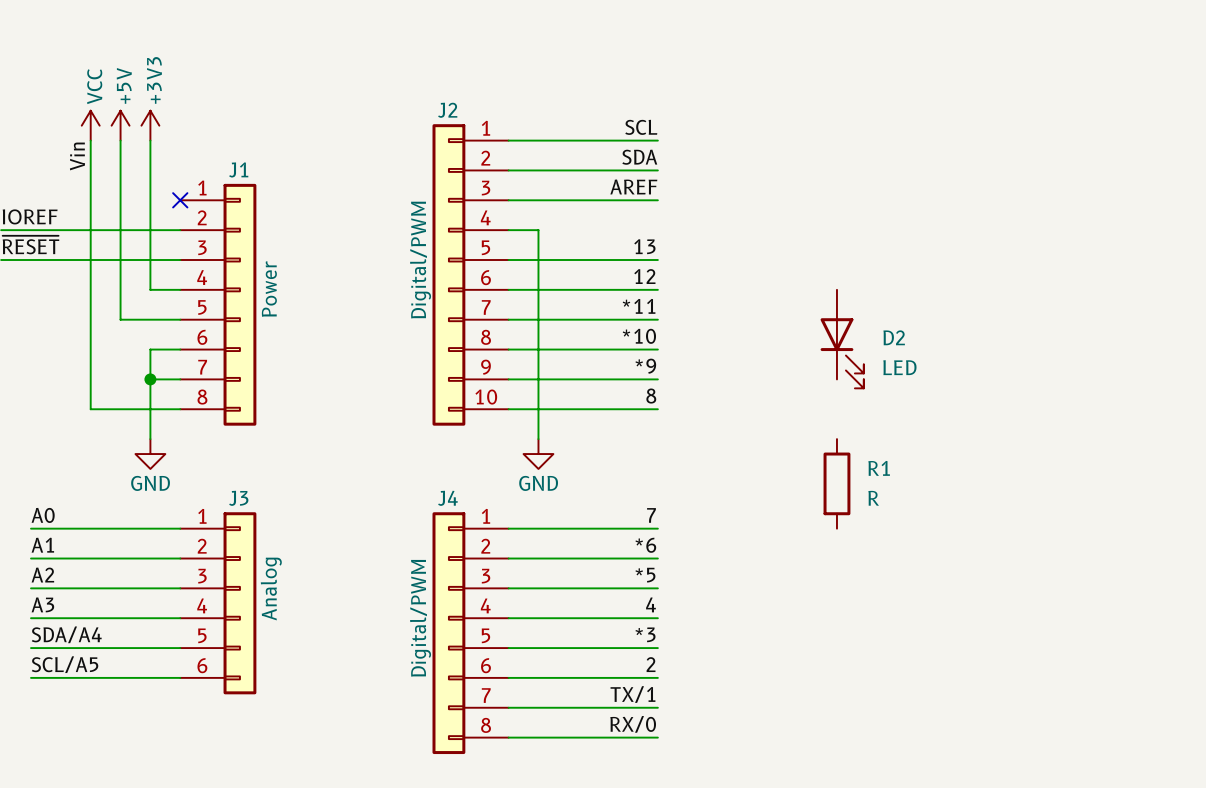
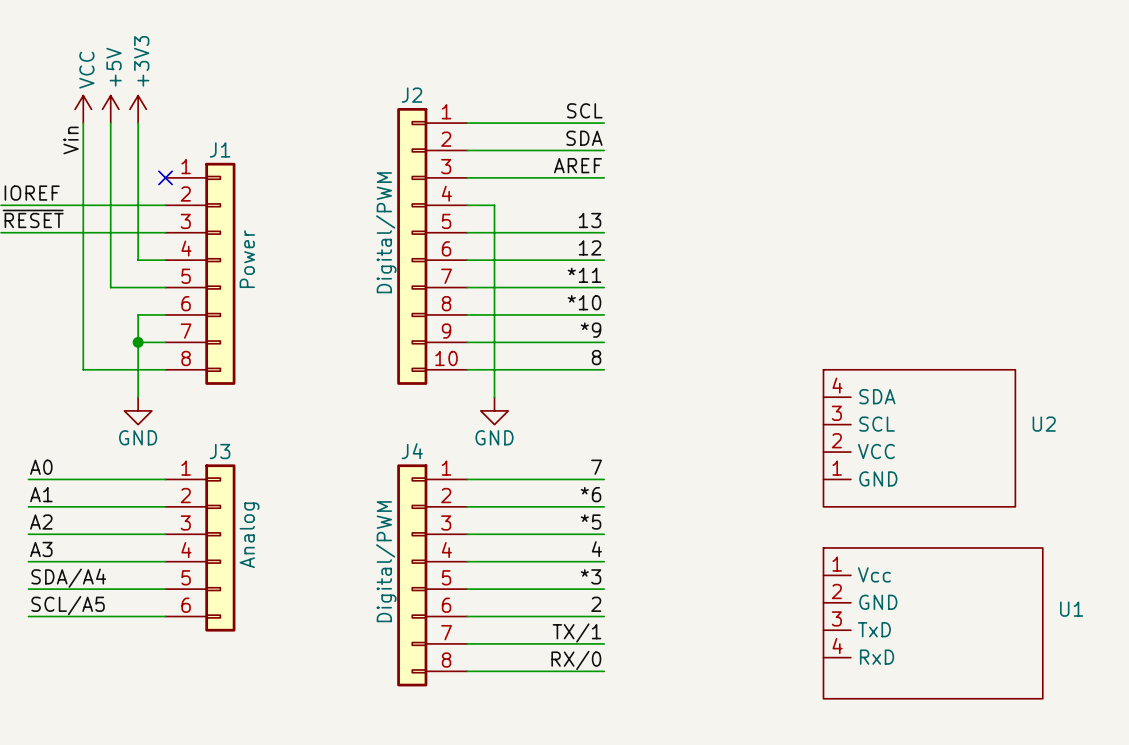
D2: LED (842, 339) -> none
R1: R (836, 483) -> none
U2: none -> (919, 438)
U1: none -> (933, 623)

